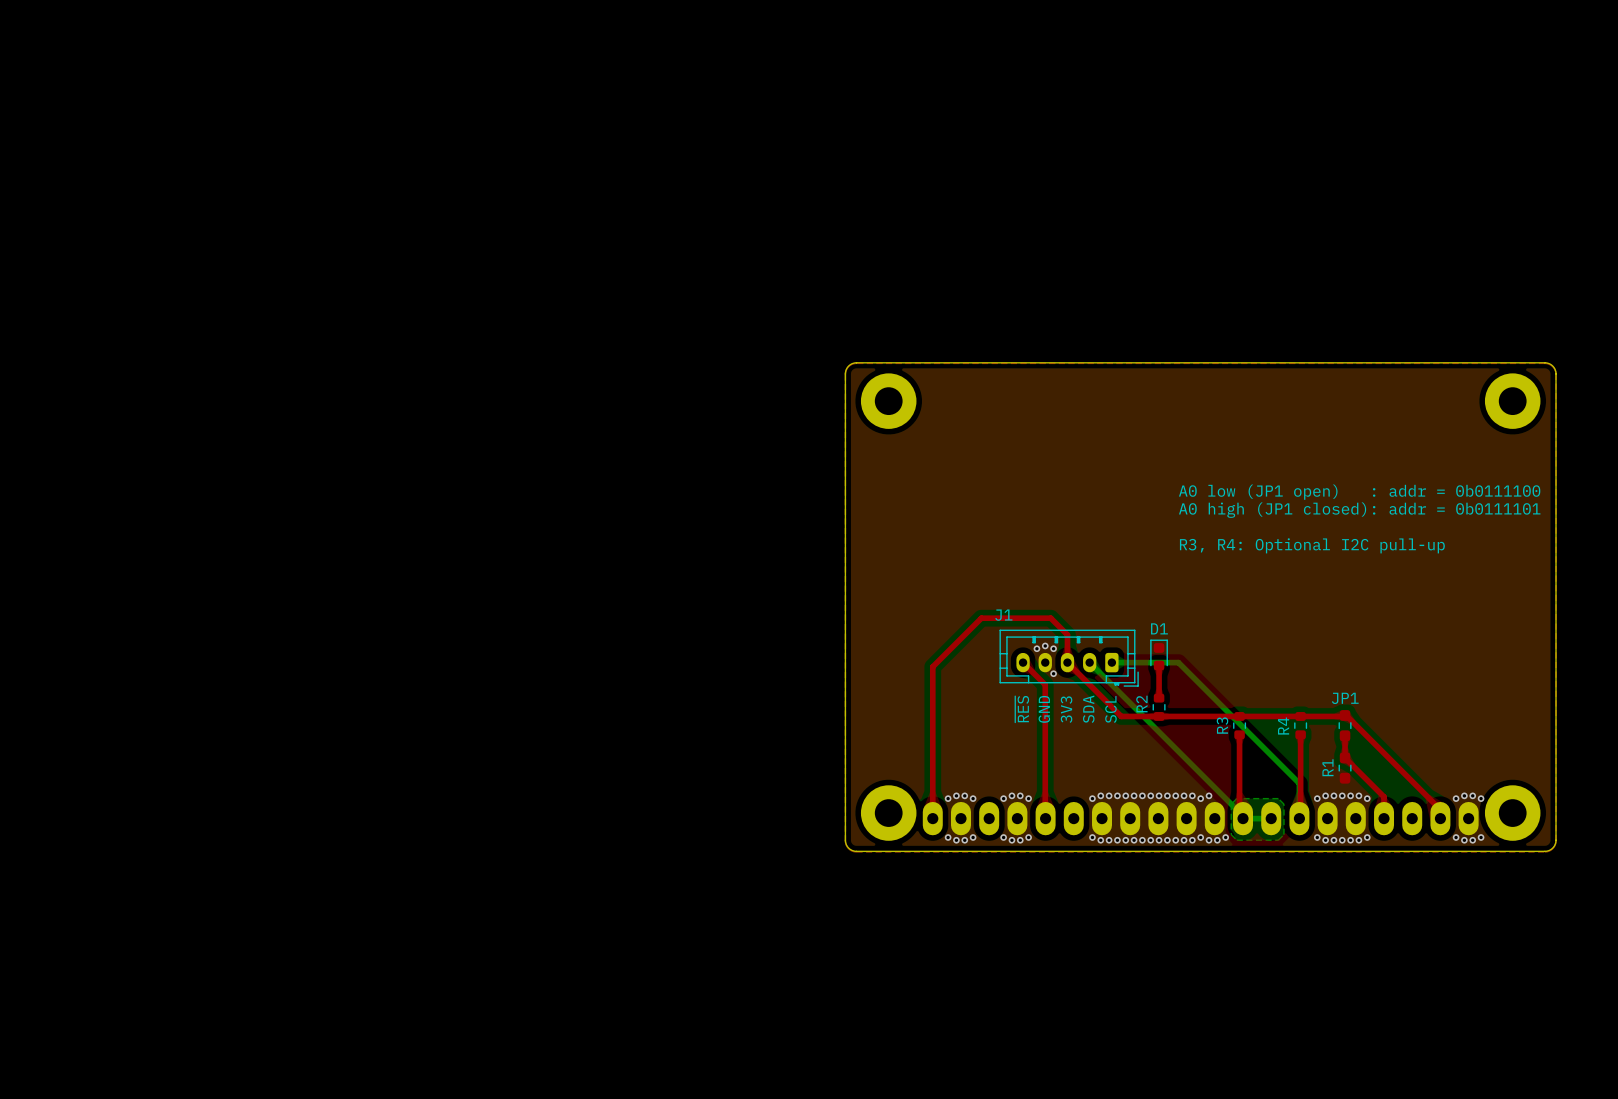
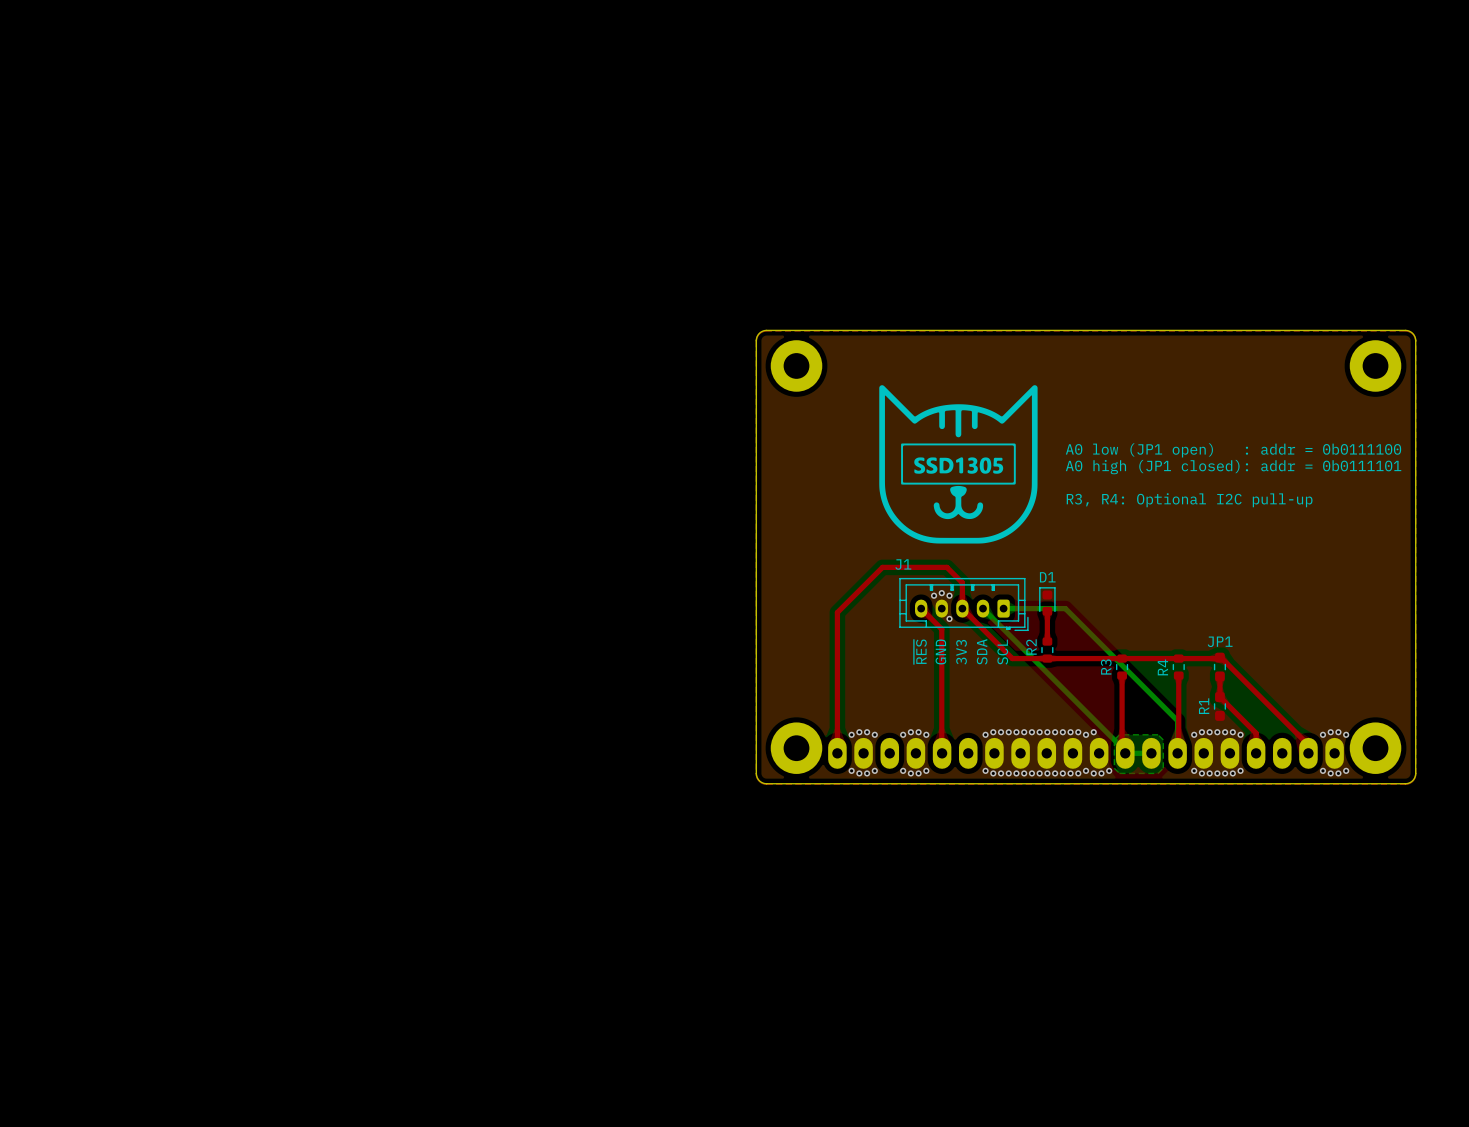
drawing: none -> [879, 385, 1038, 544]

